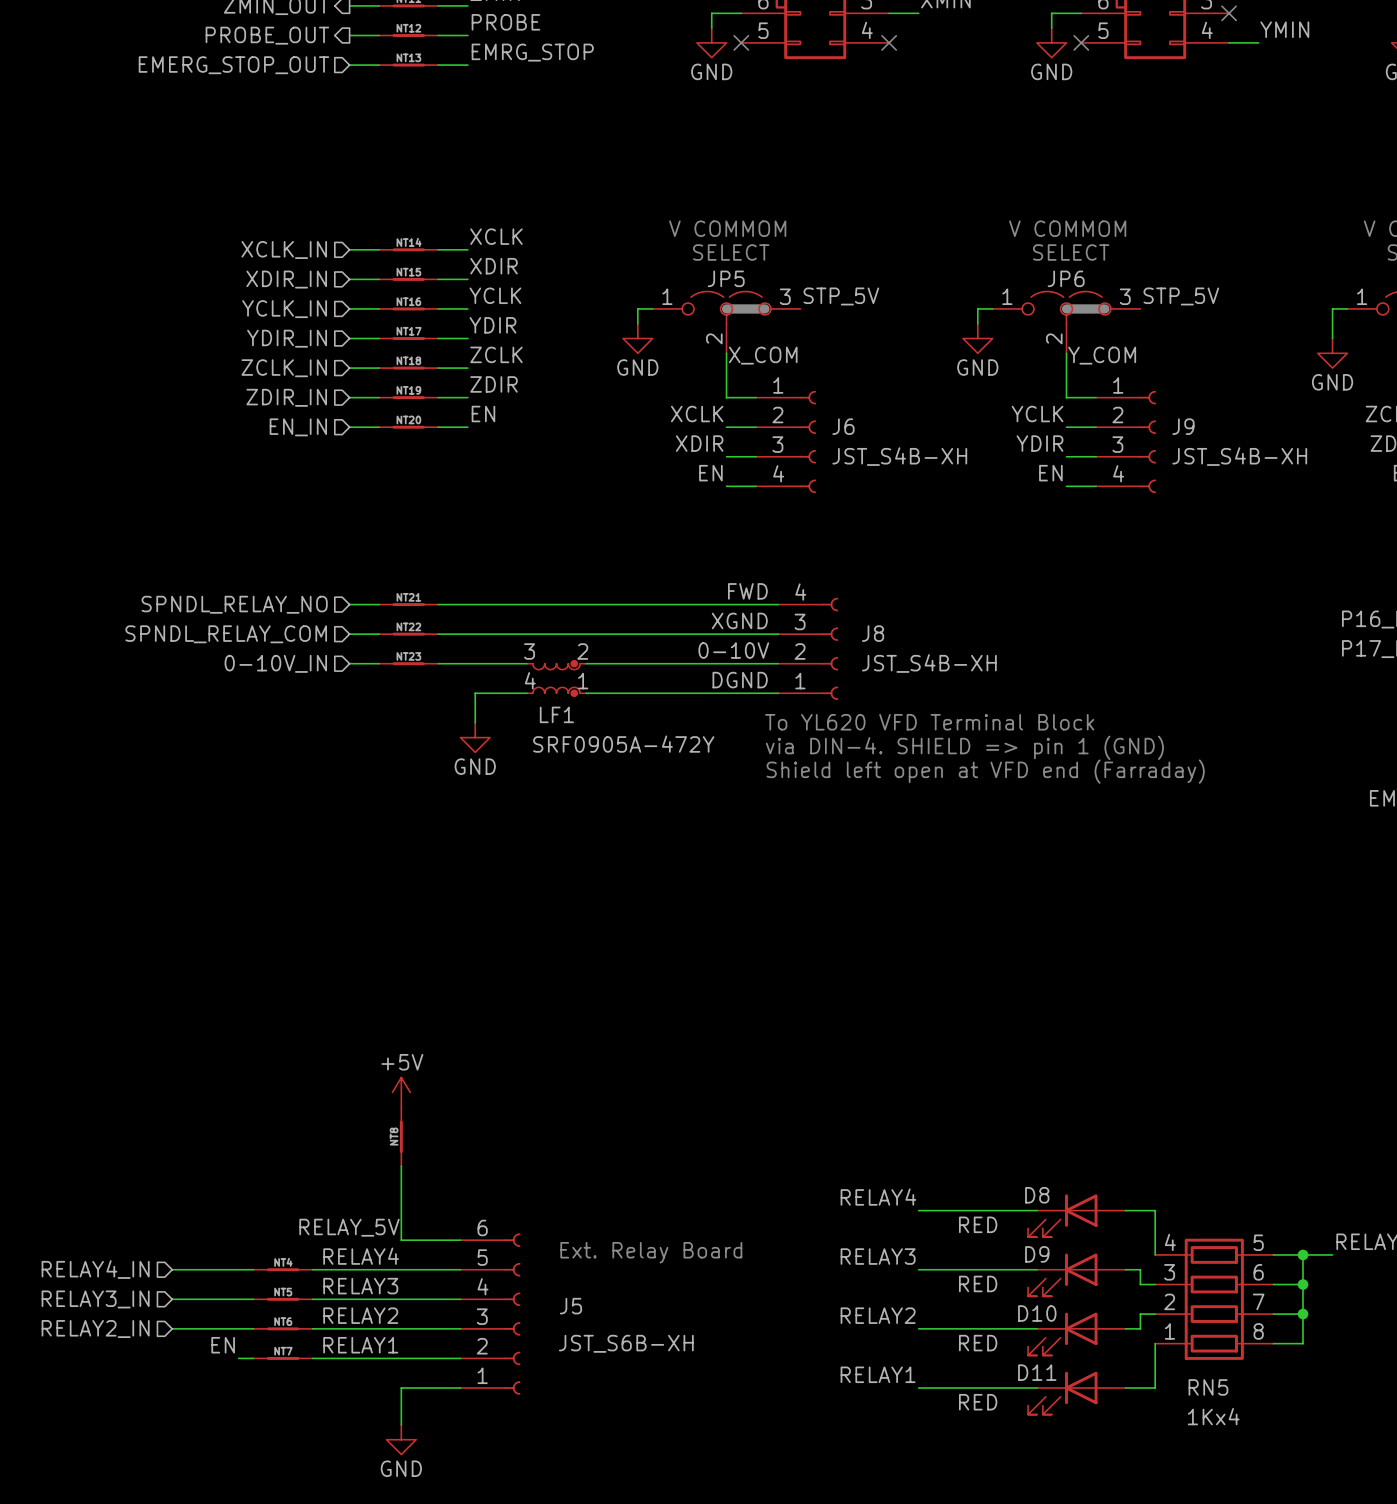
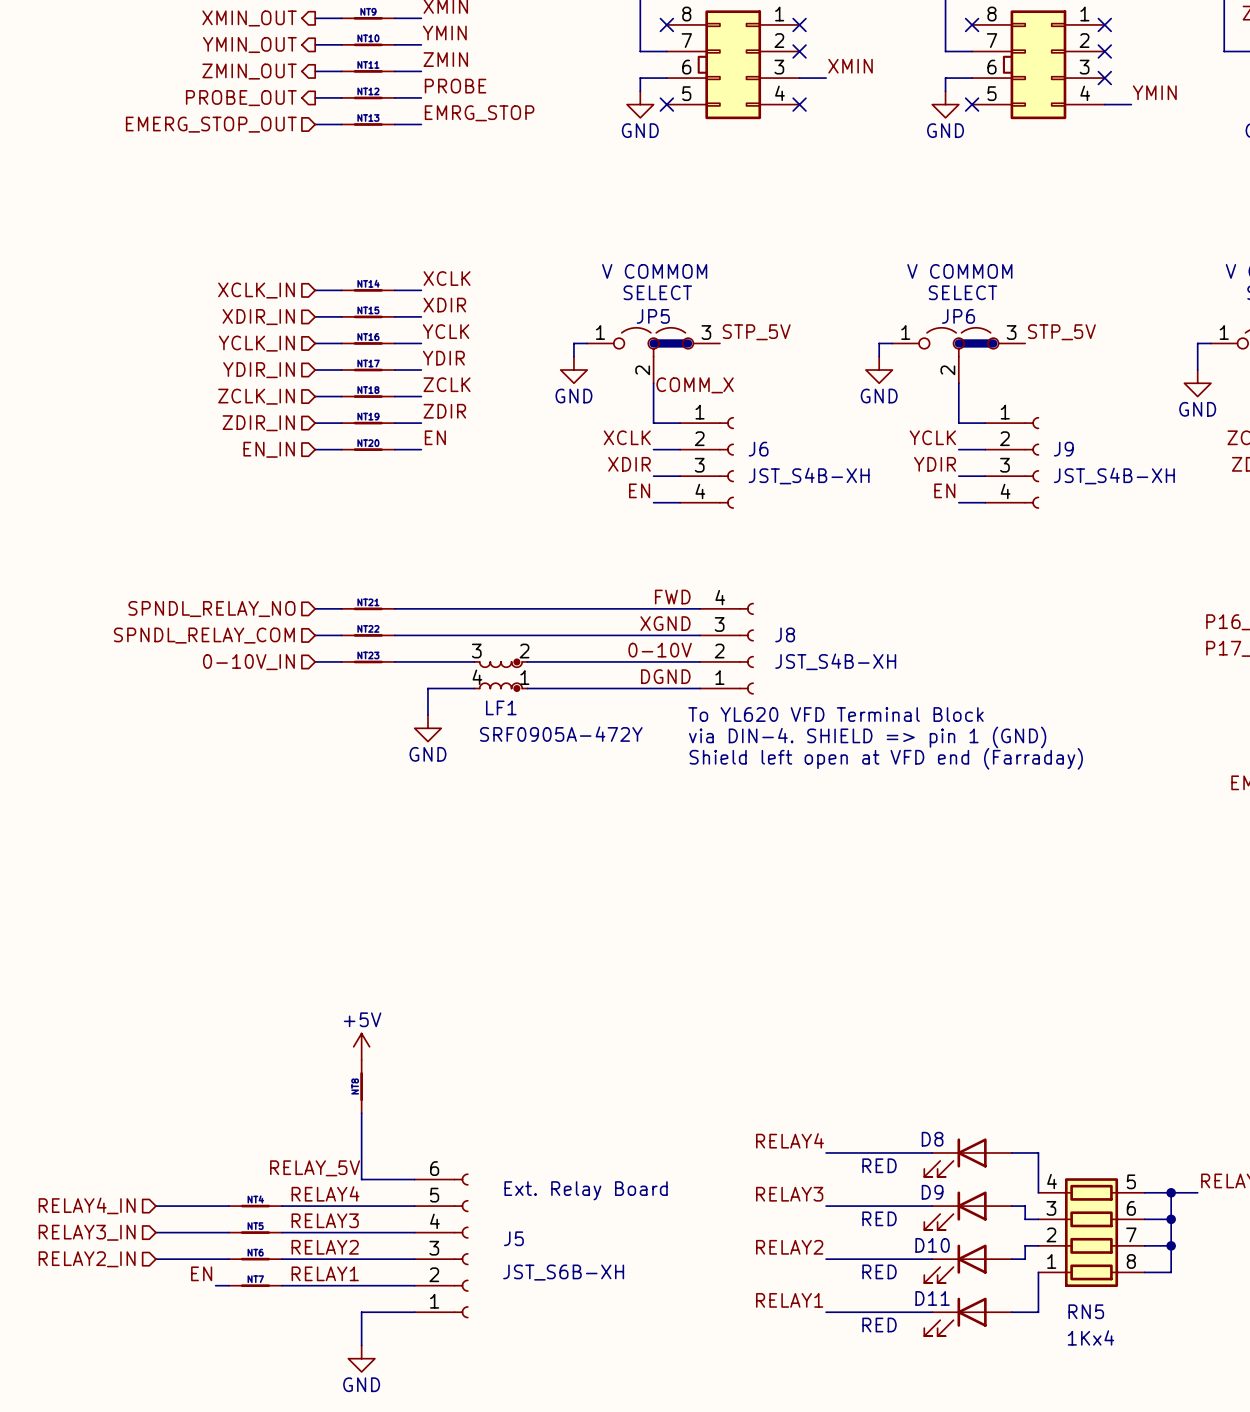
label: X_COM (763, 355) -> COMM_X (695, 385)
label: Y_COM (1102, 355) -> none

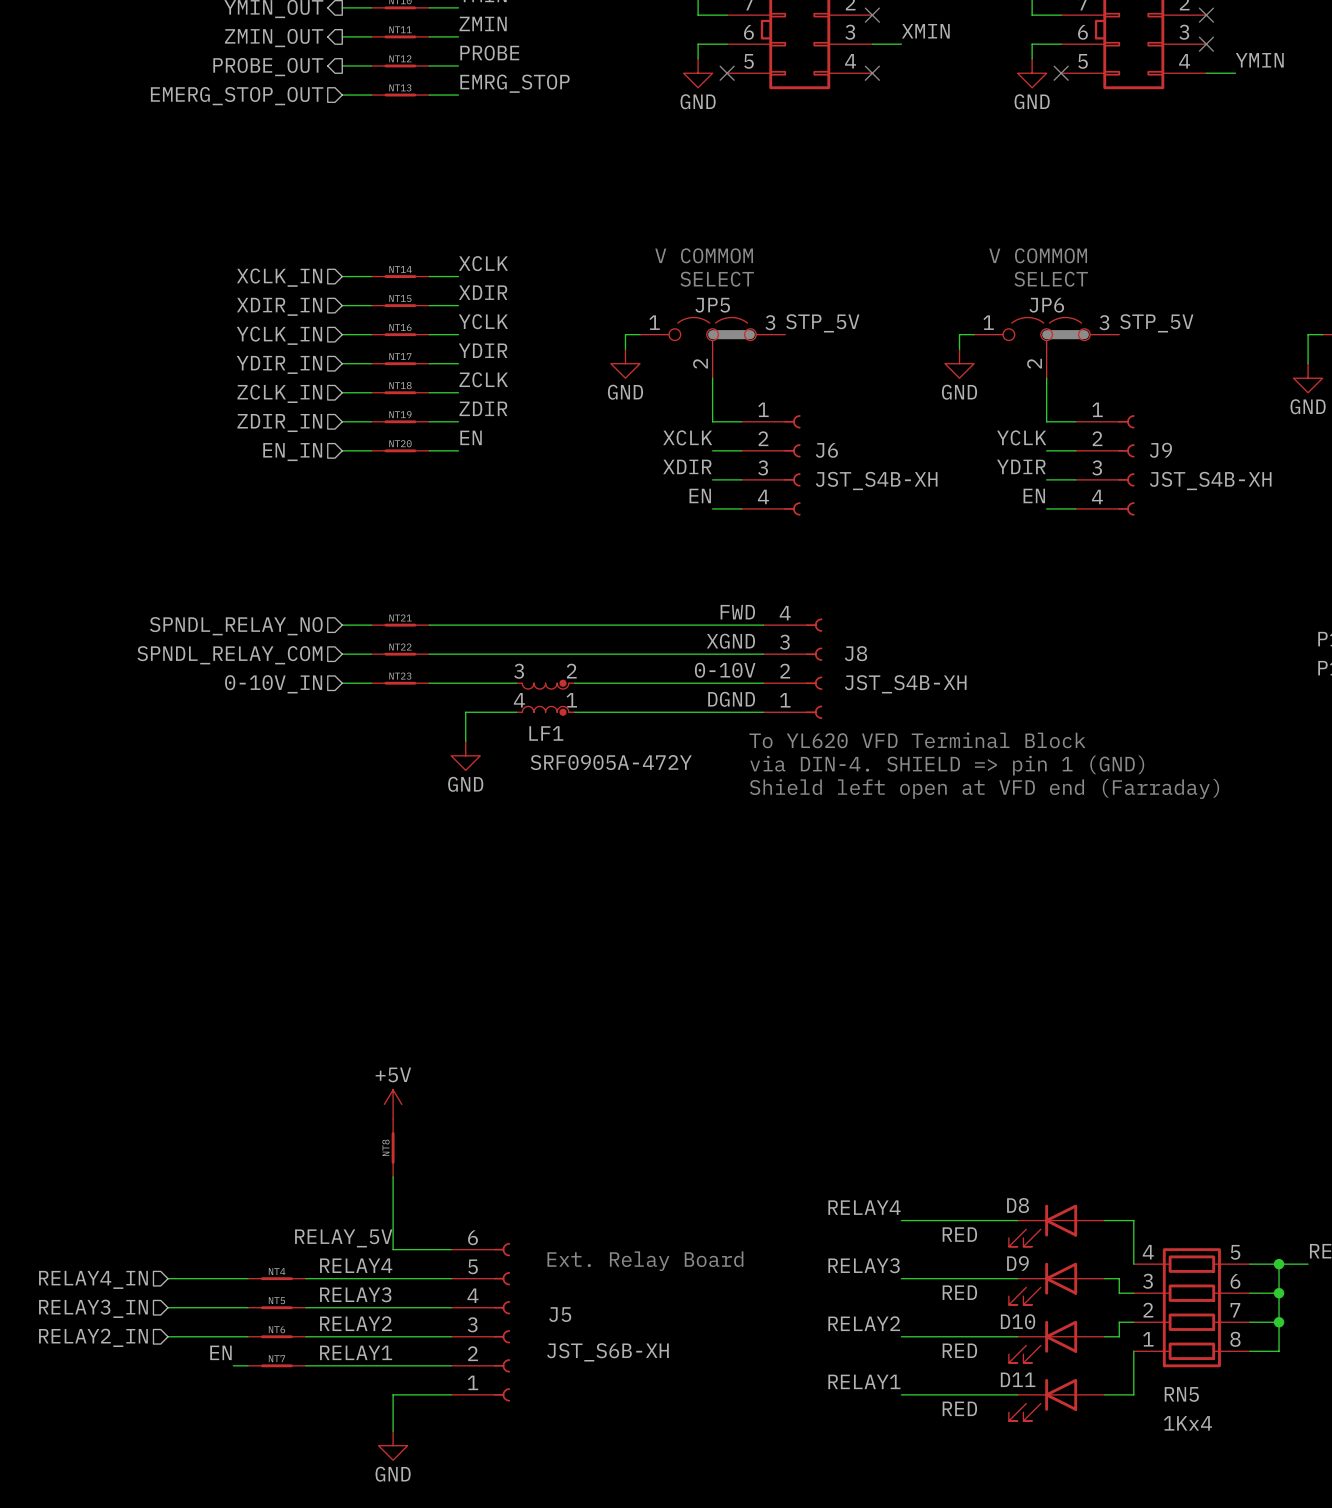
label: COMM_X (695, 385) -> none

